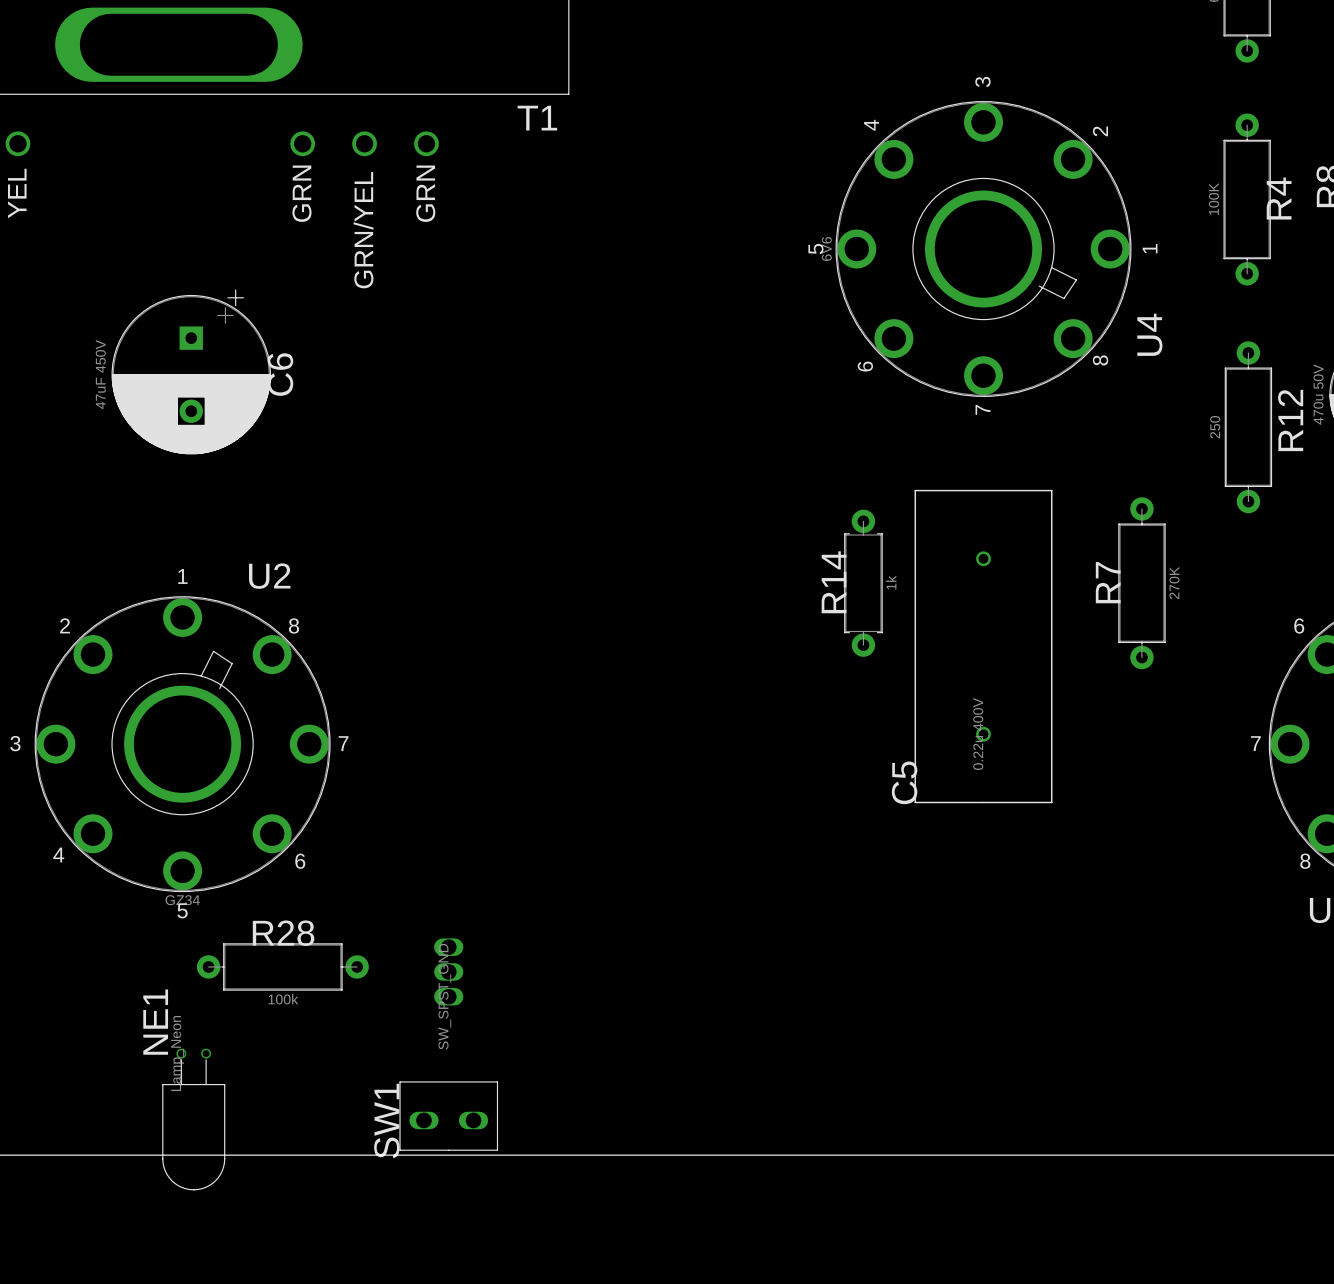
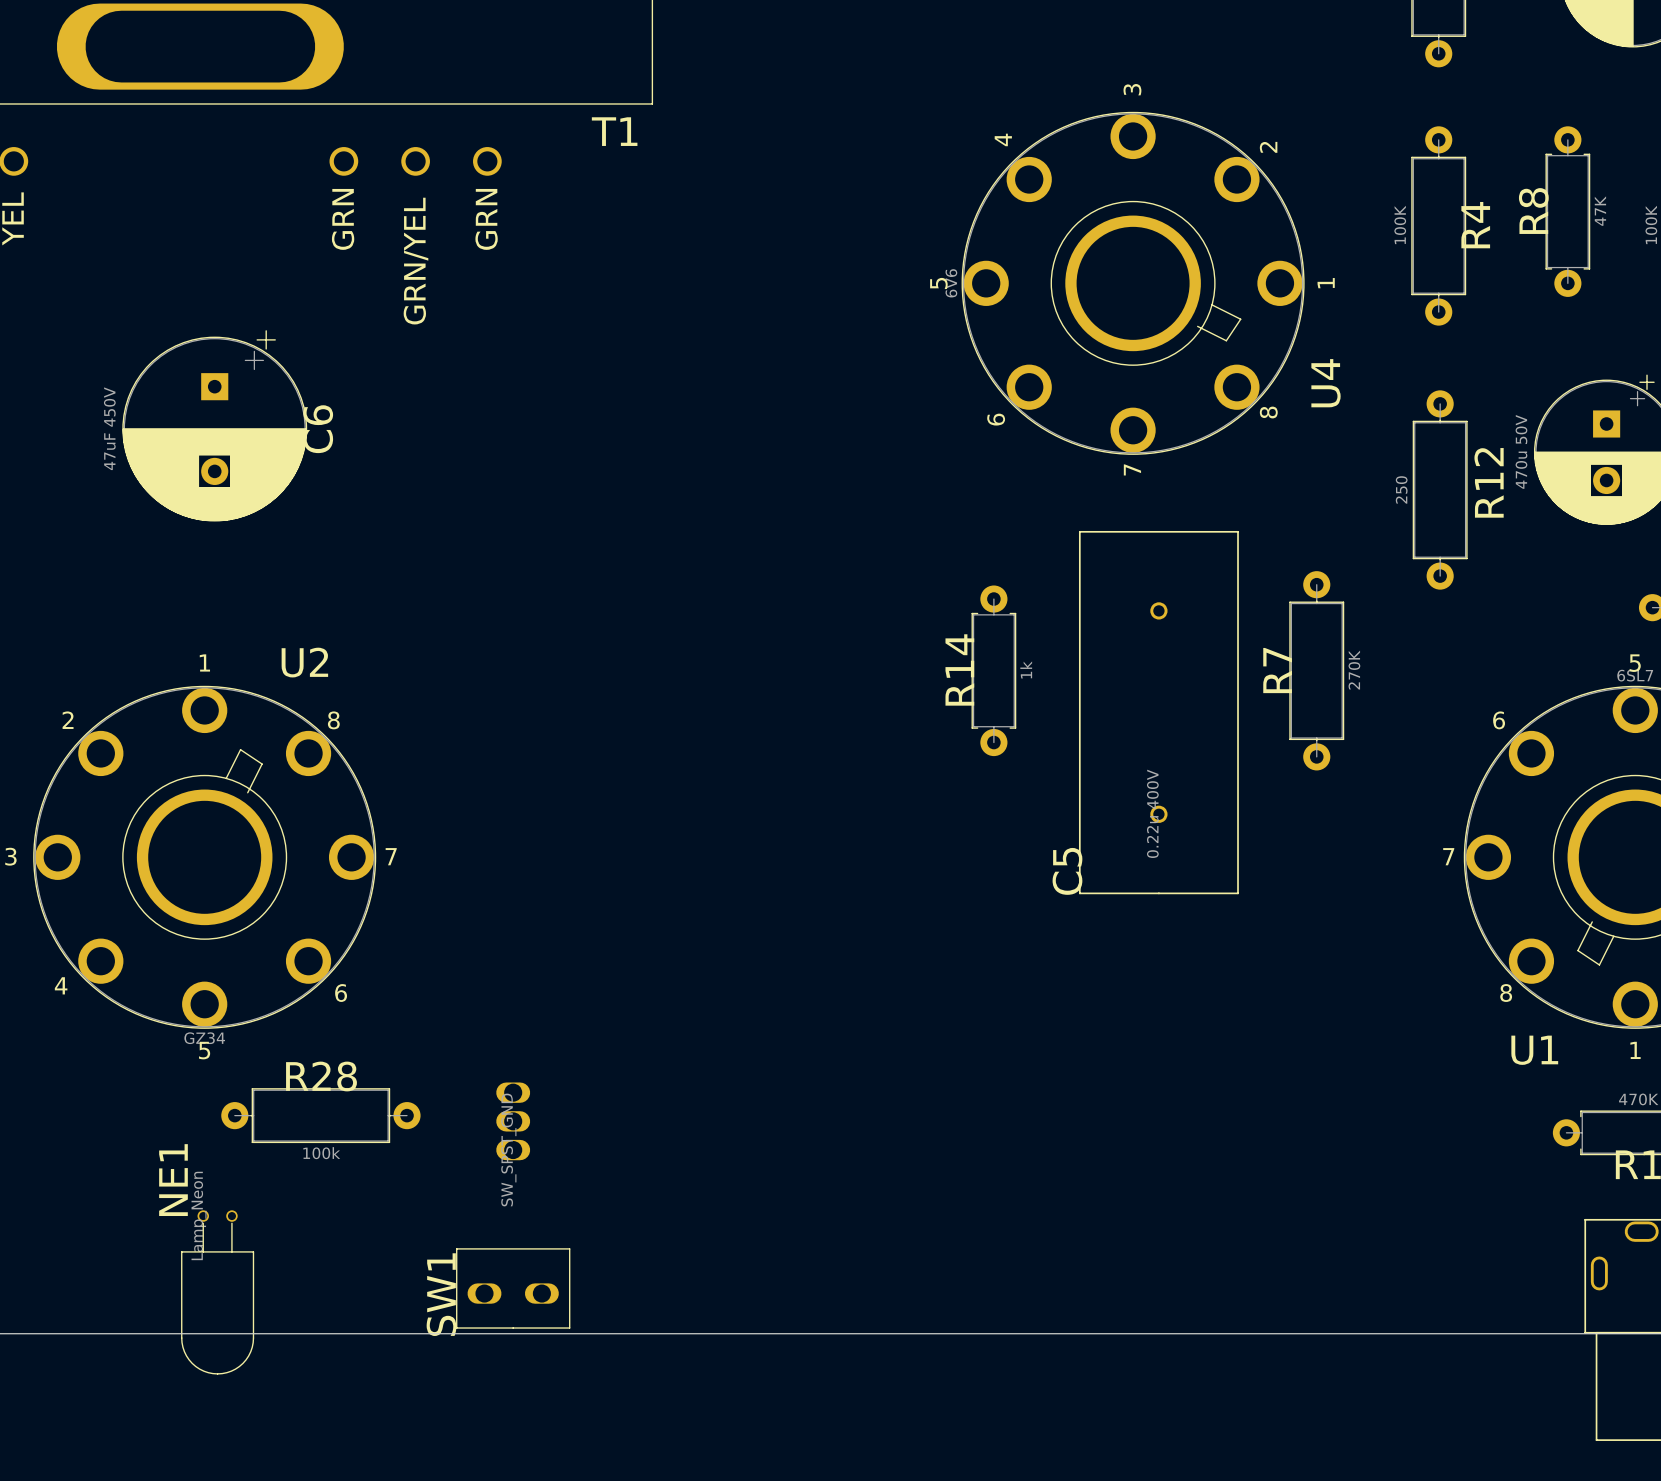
C5 position: (983, 646) -> (1158, 712)

